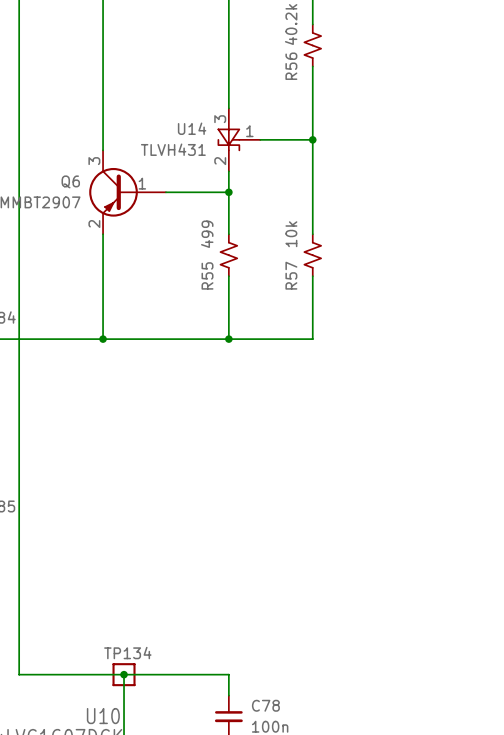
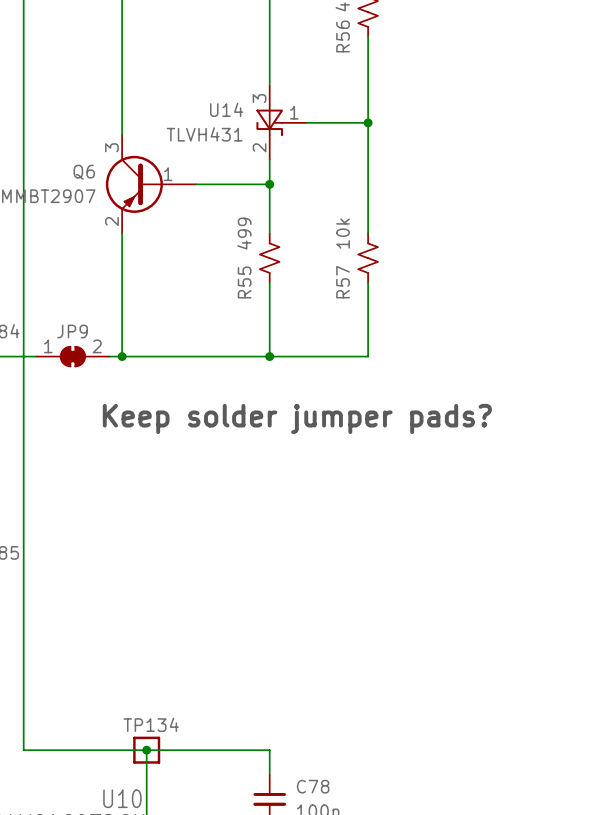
JP9: none -> (72, 356)
text: none -> Keep solder jumper pads? (297, 418)

